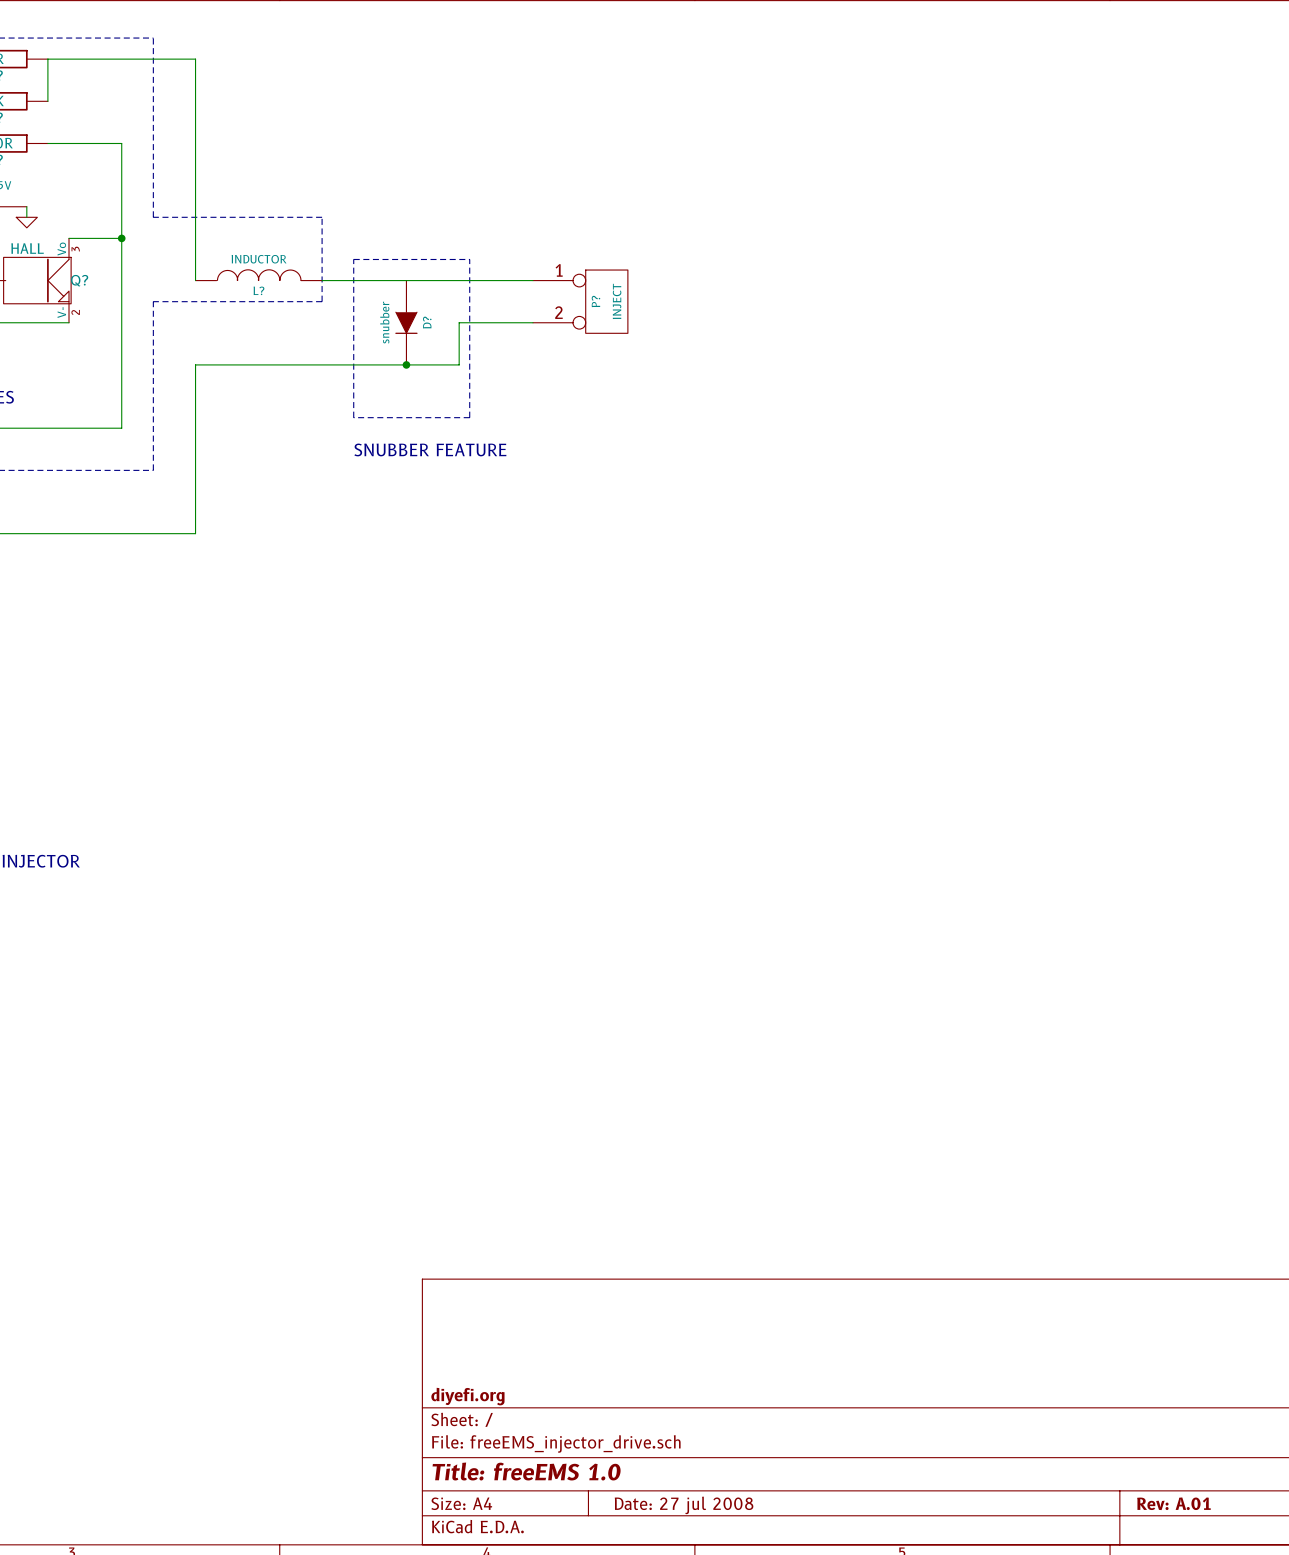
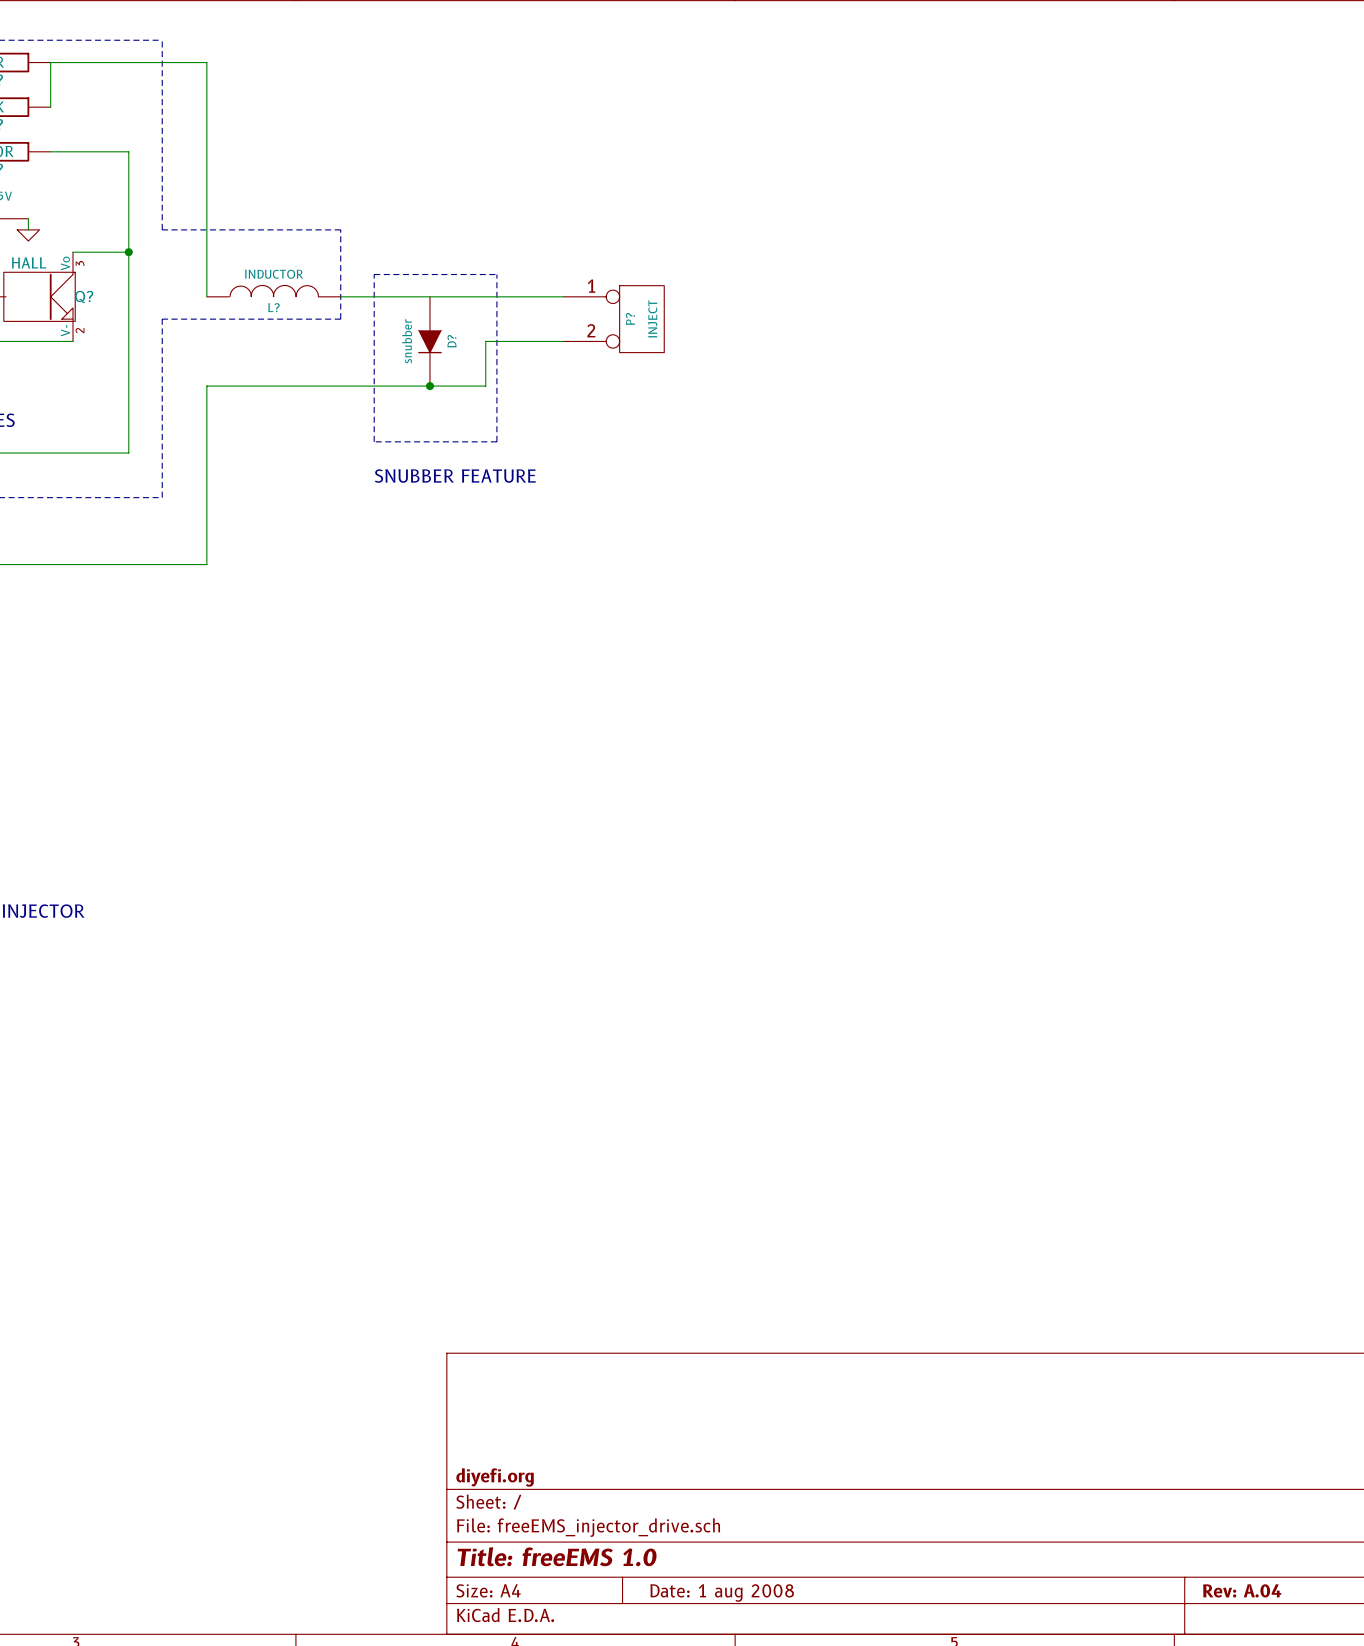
title block: Rev: A.01 (1173, 1503) -> Rev: A.04 (1242, 1590)
title block: Date: 27 jul 2008 (684, 1505) -> Date: 1 aug 2008 (722, 1593)

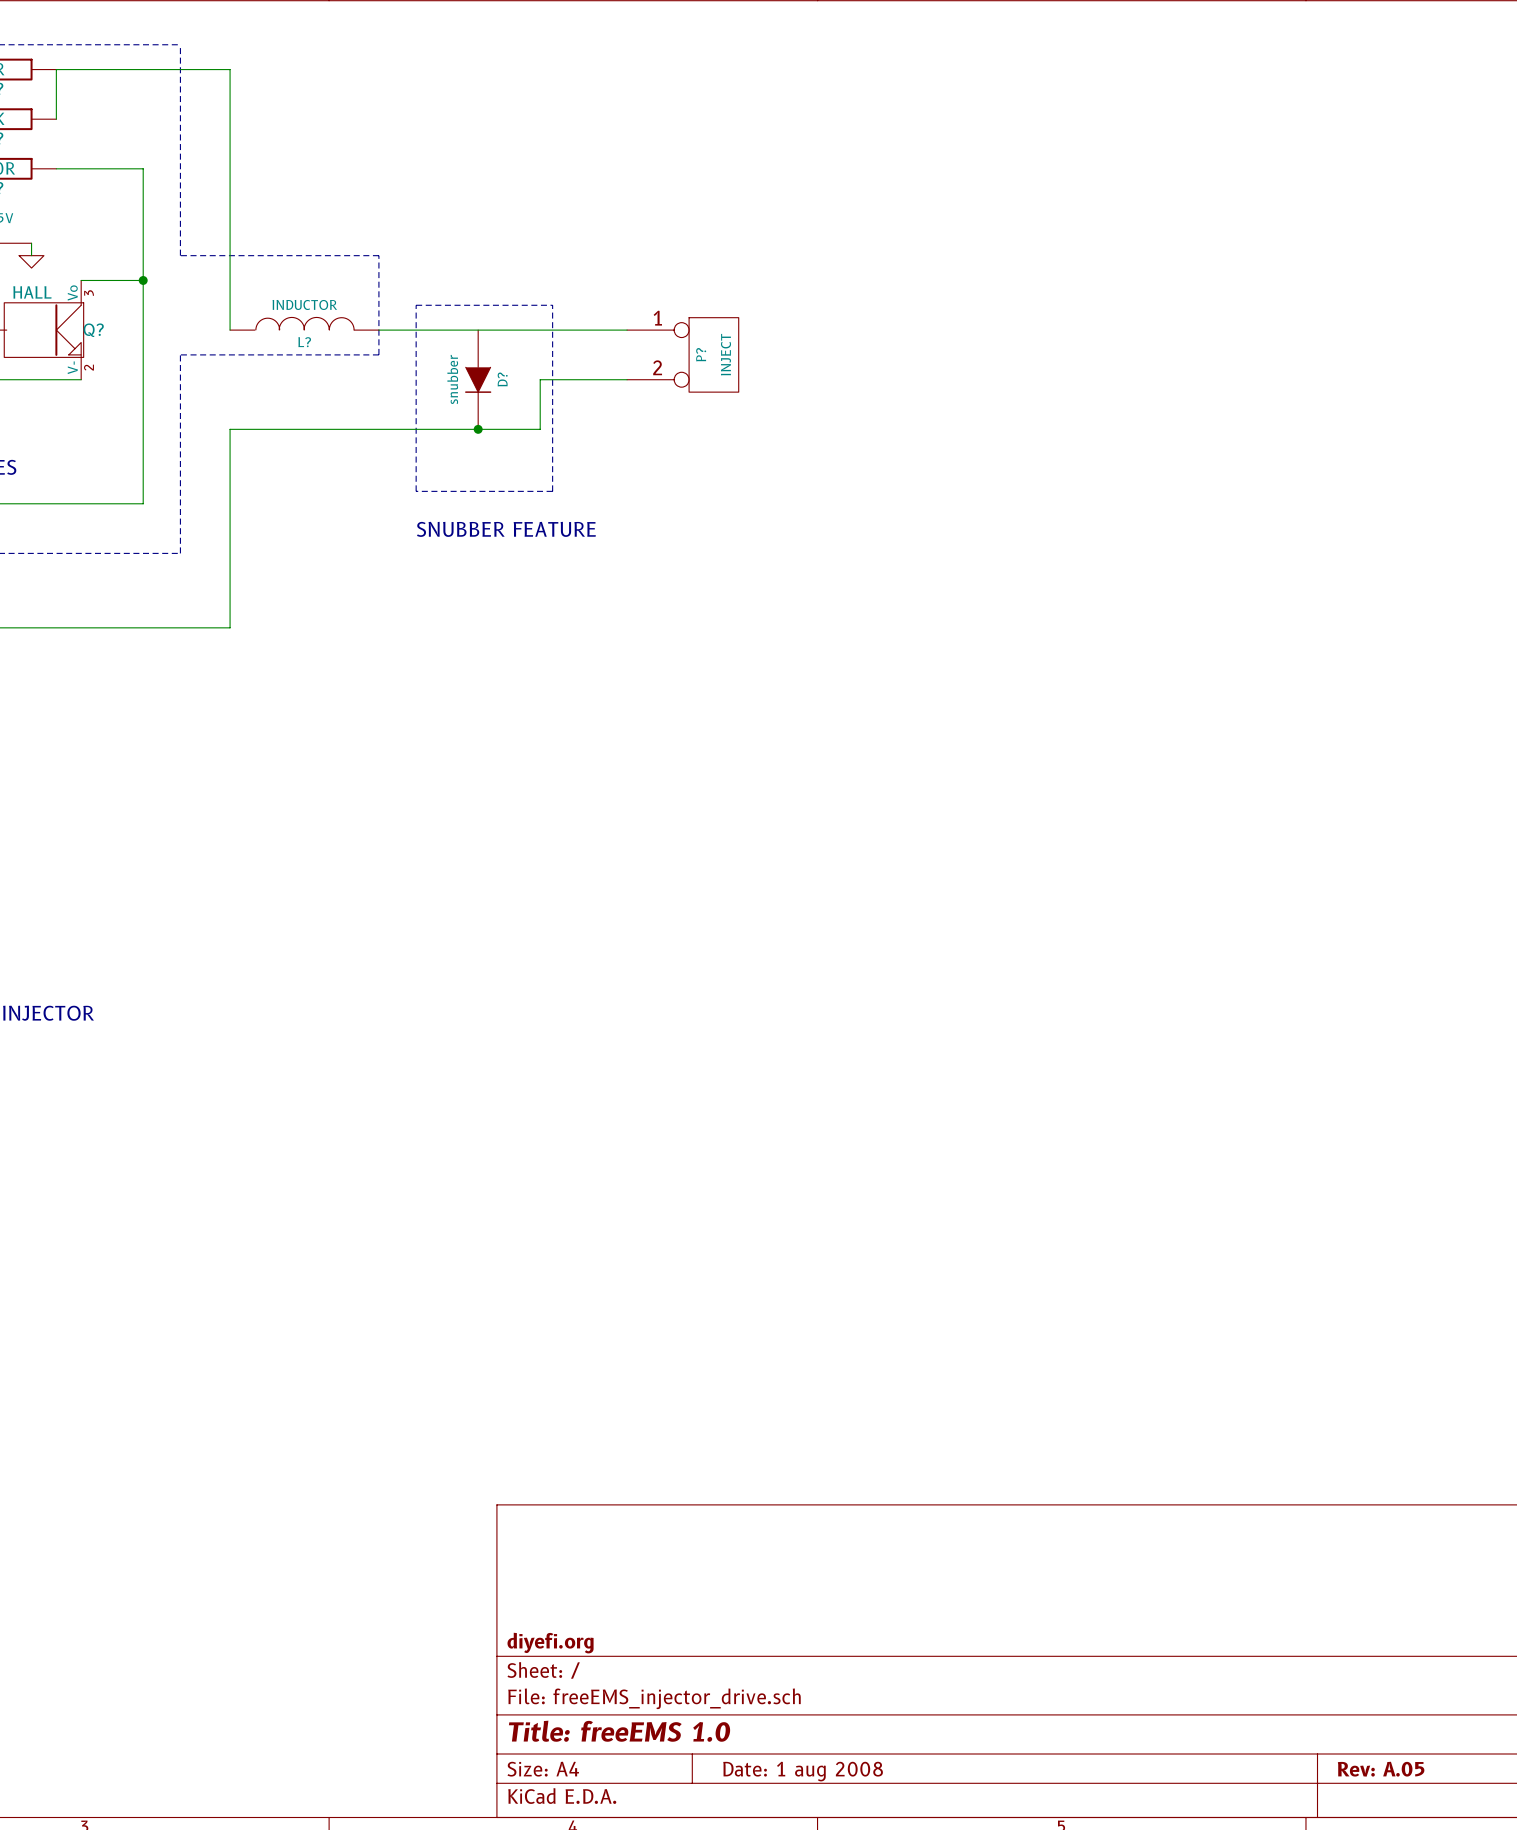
title block: Rev: A.04 (1242, 1590) -> Rev: A.05 (1381, 1769)

